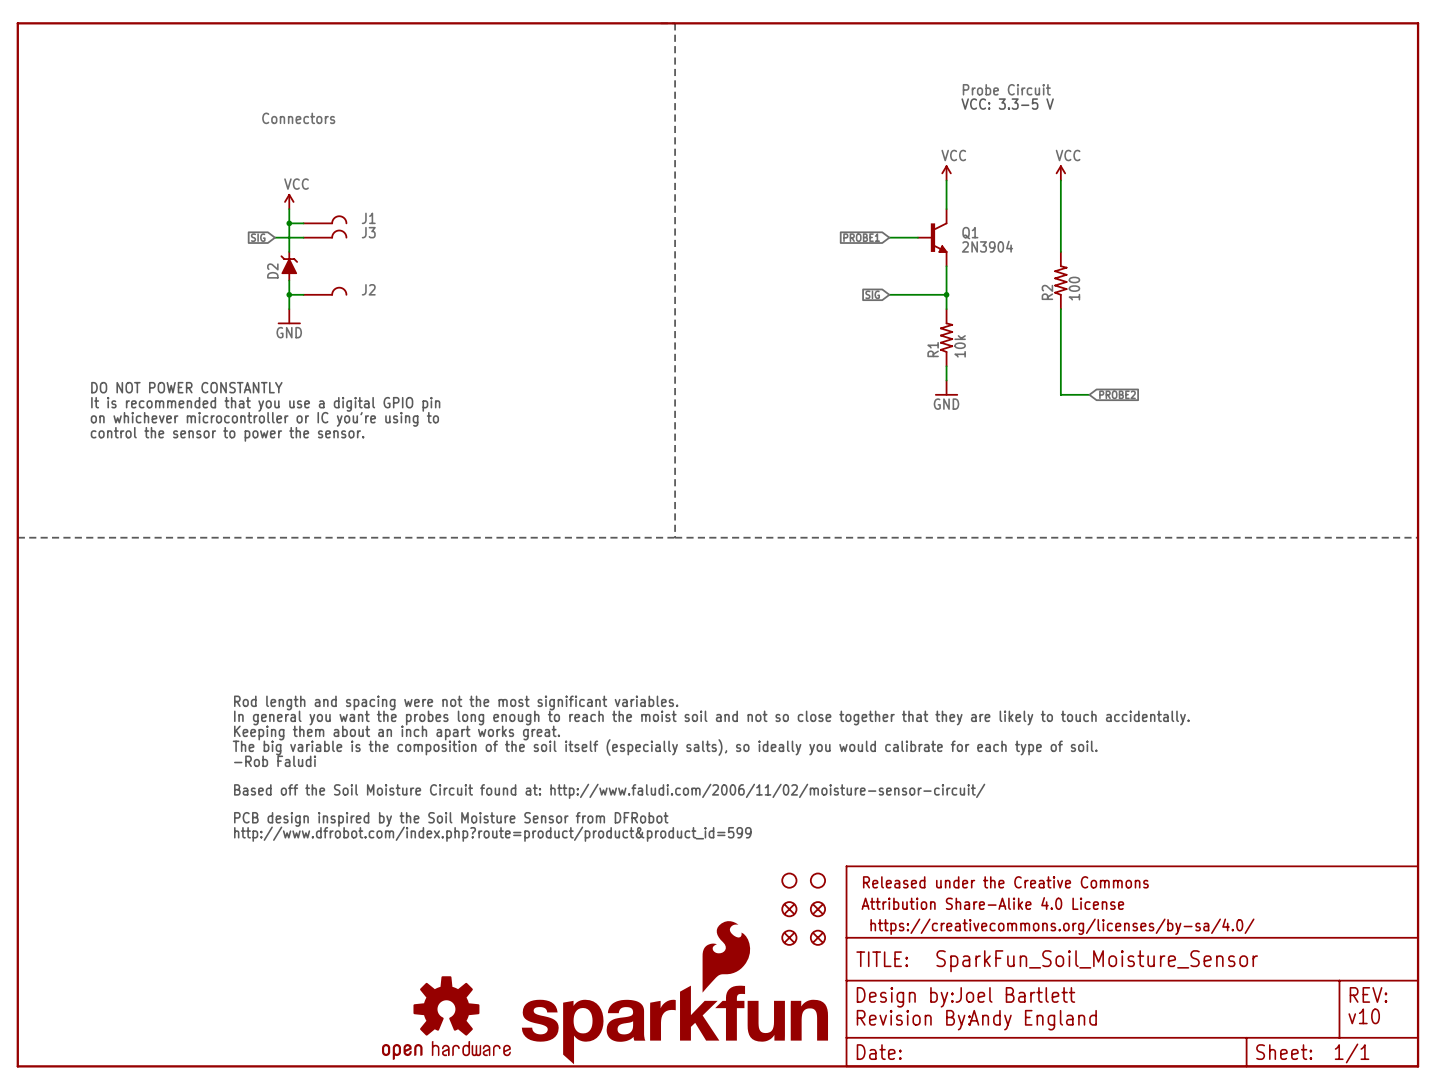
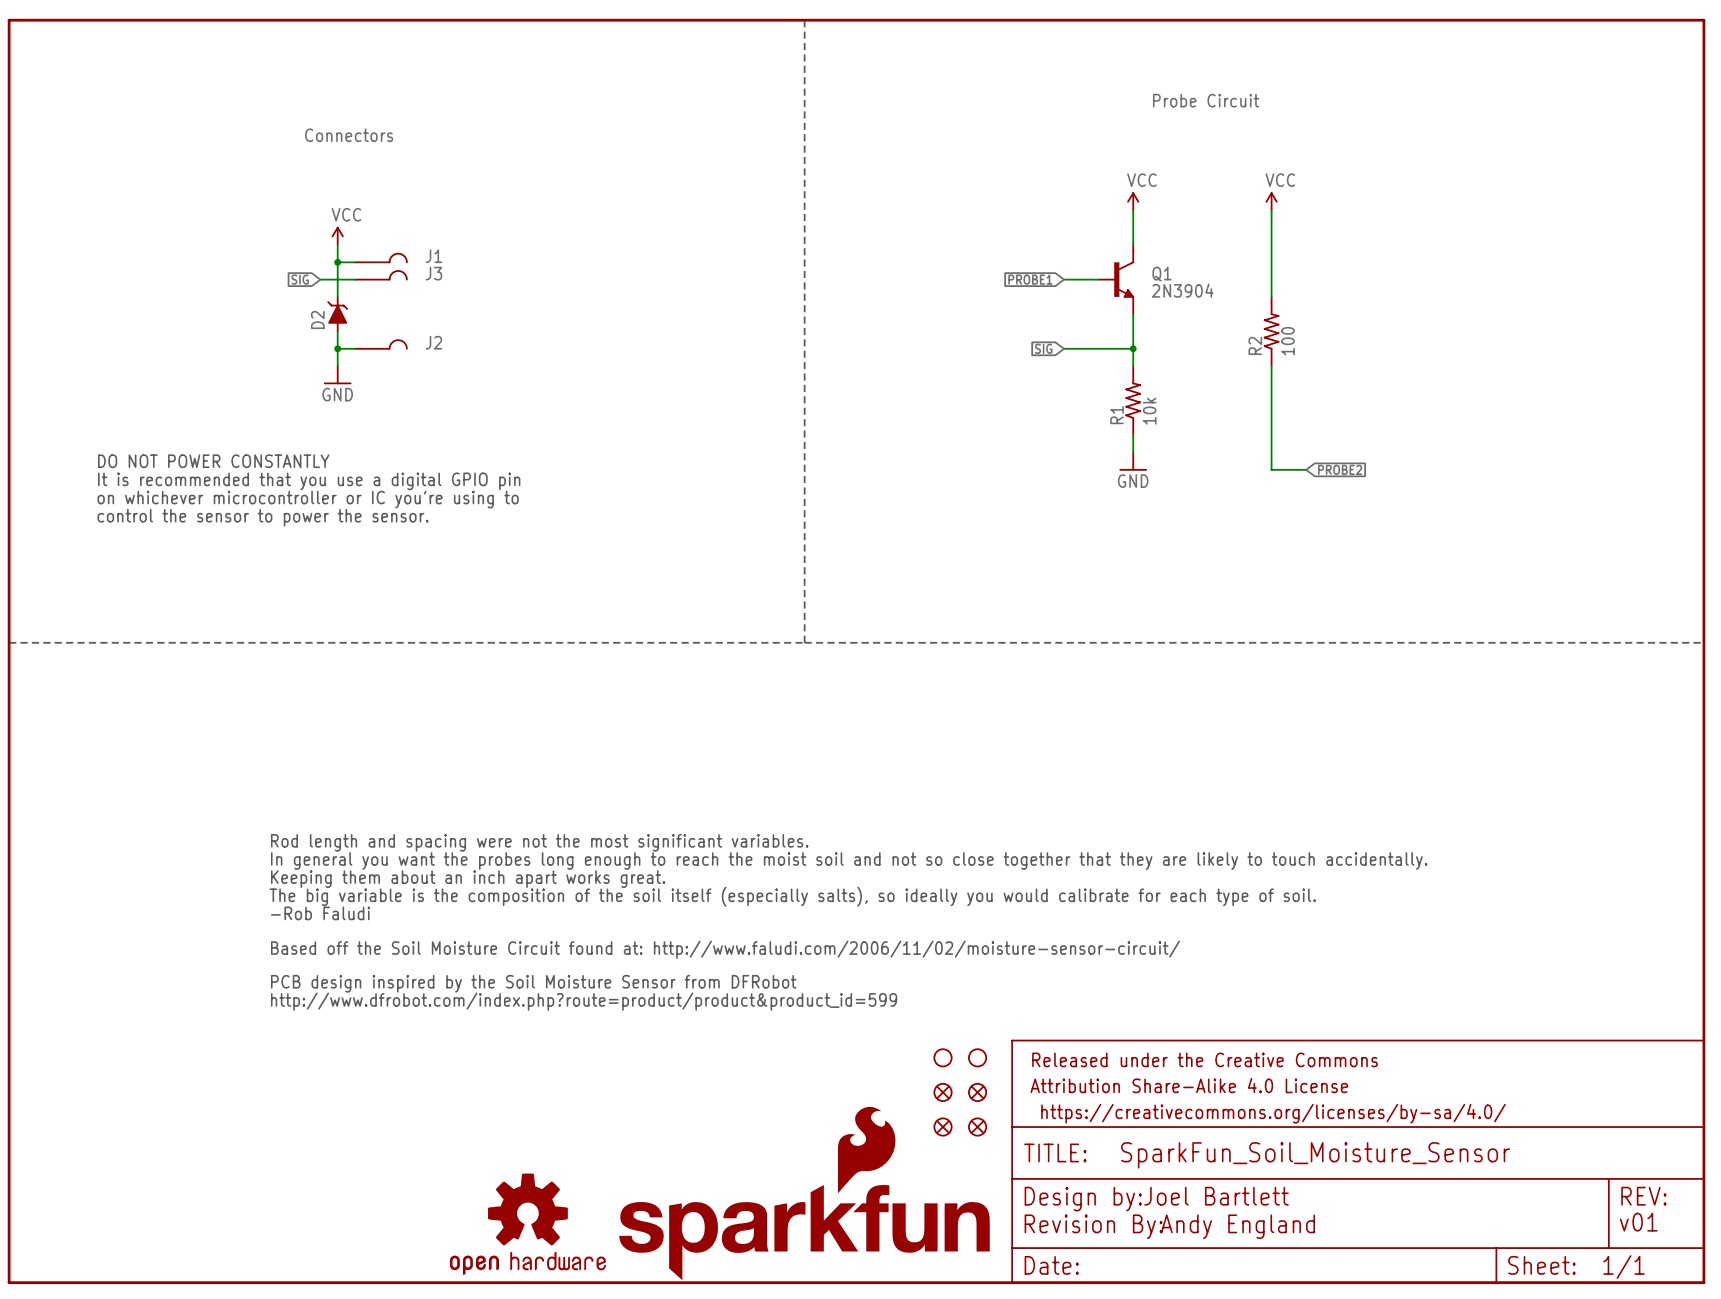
text: VCC: 3.3-5 V (1007, 104) -> none
text: v10 (1364, 1016) -> v01 (1638, 1222)

